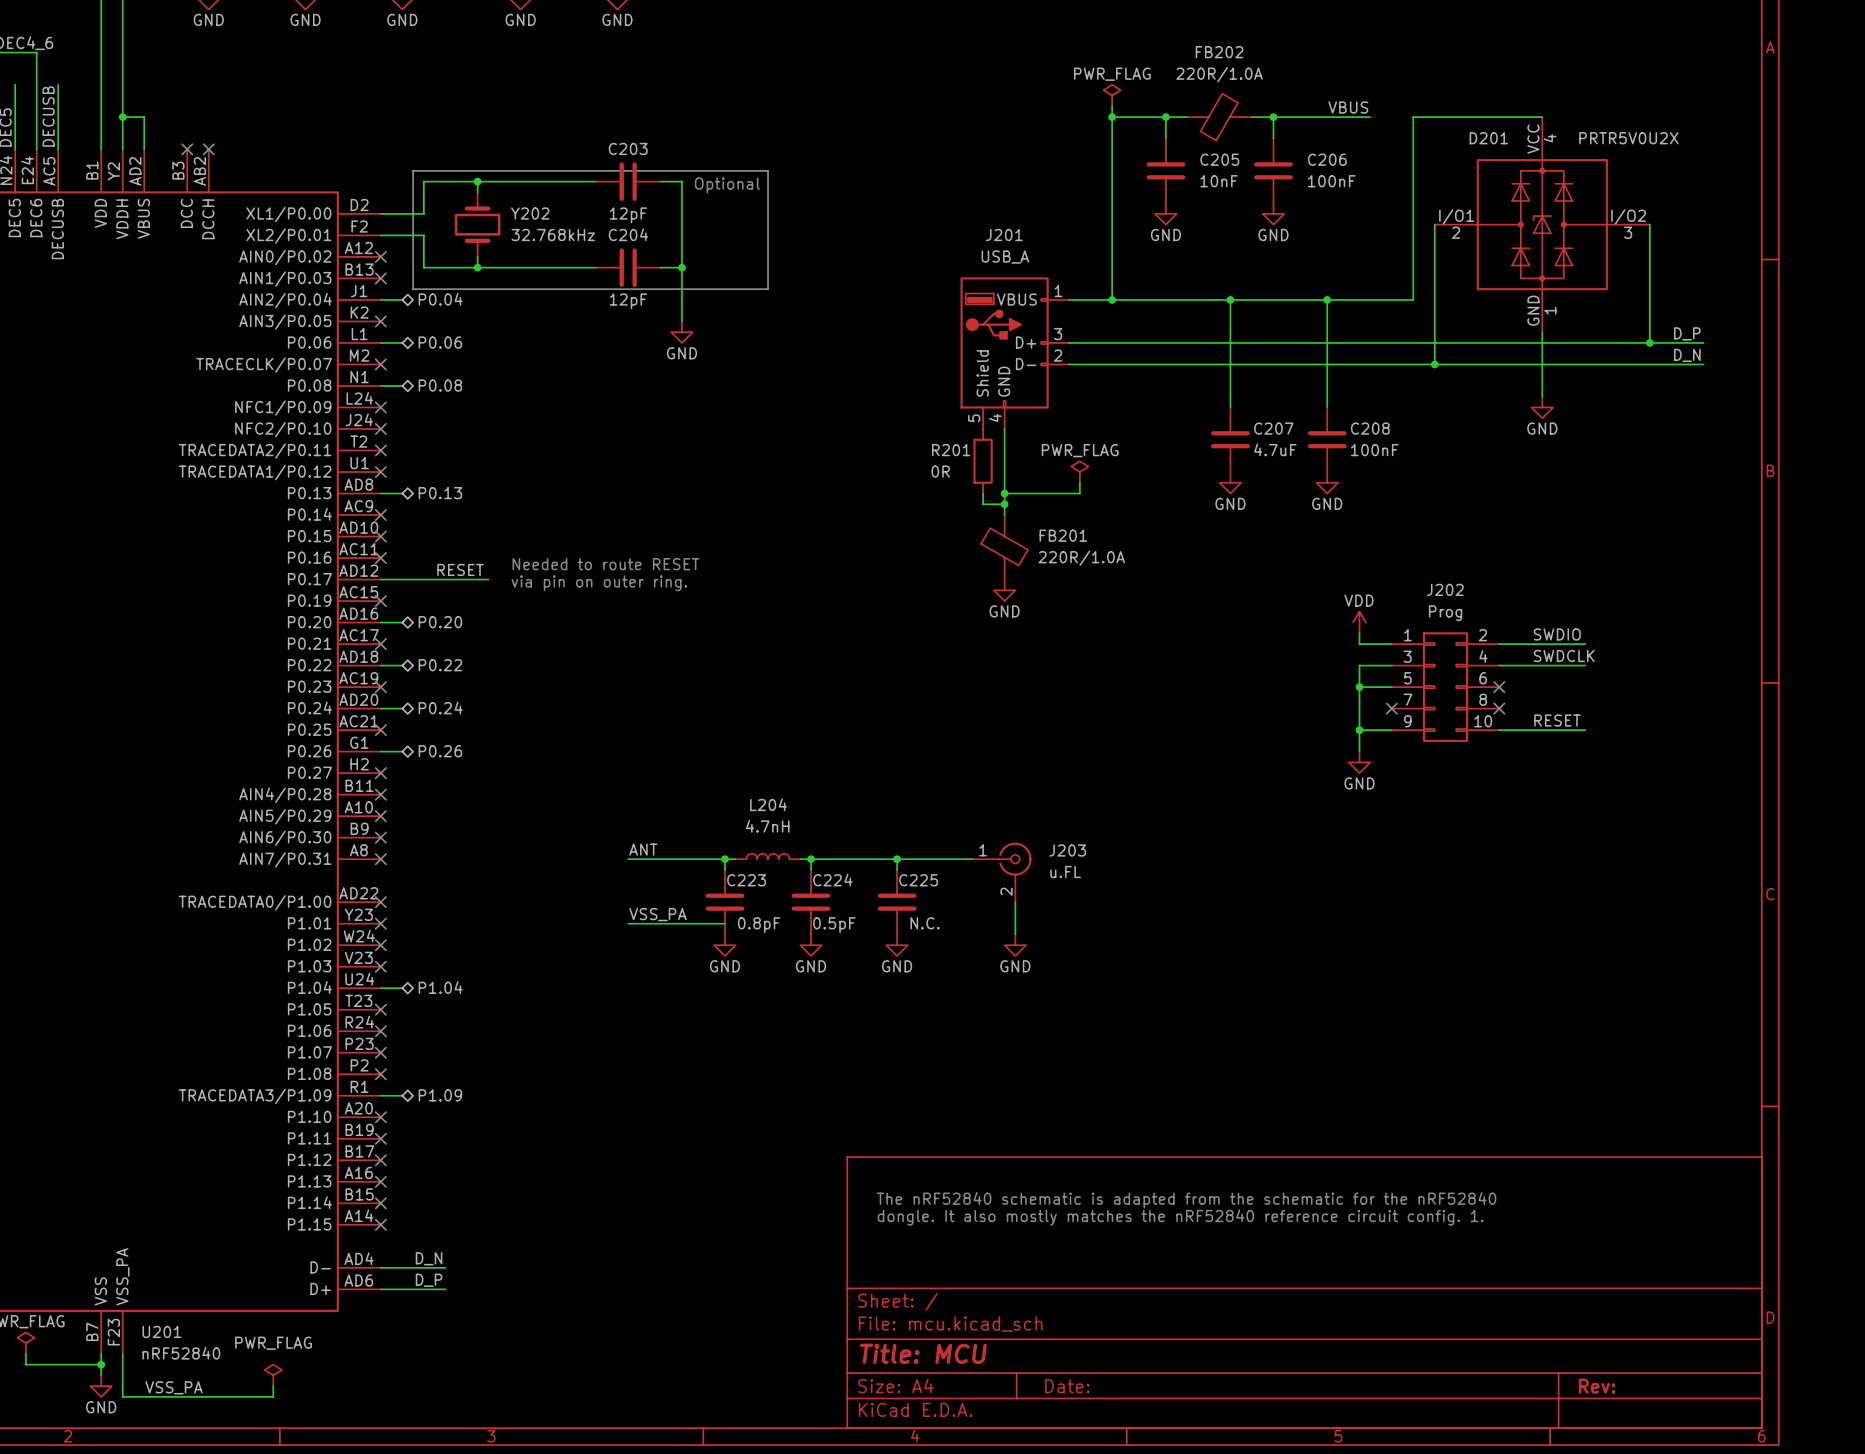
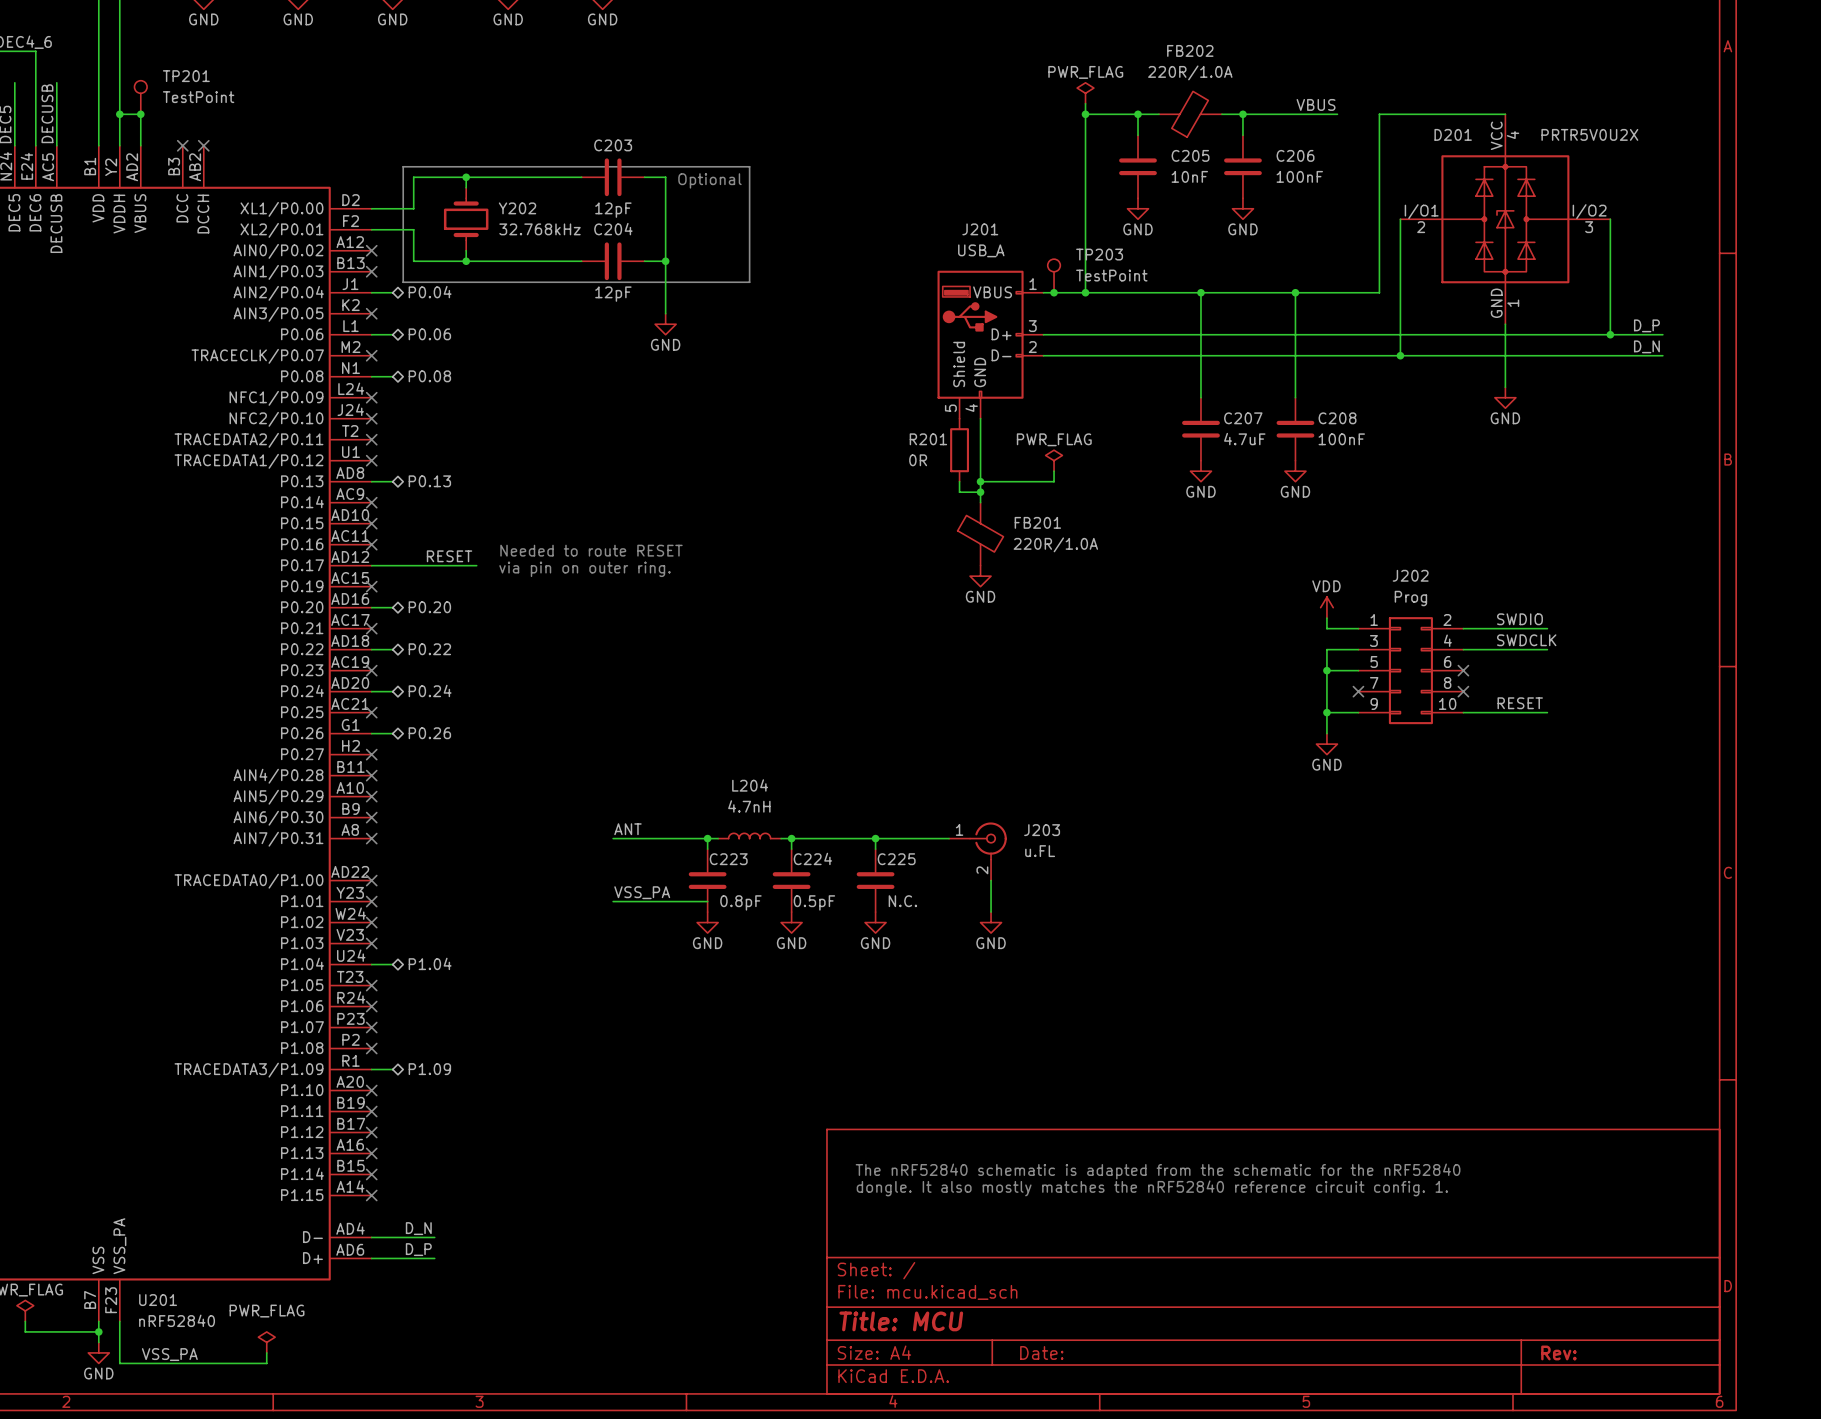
TP201: none -> TestPoint (140, 97)
junction: none -> (140, 114)
TP203: none -> TestPoint (1054, 275)
junction: none -> (1054, 292)

